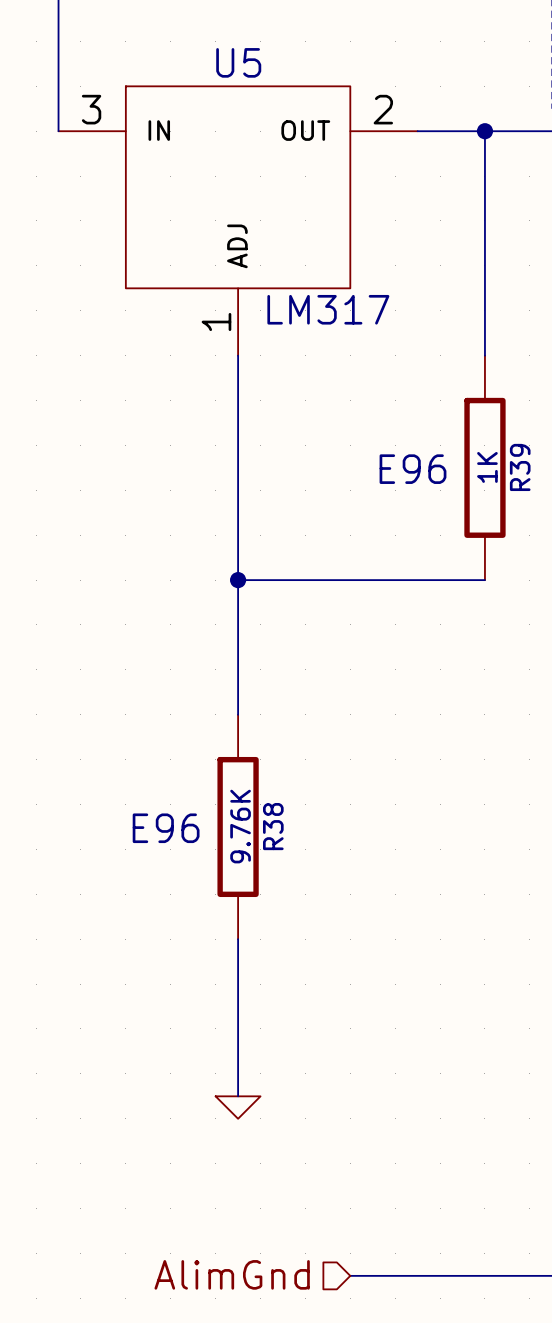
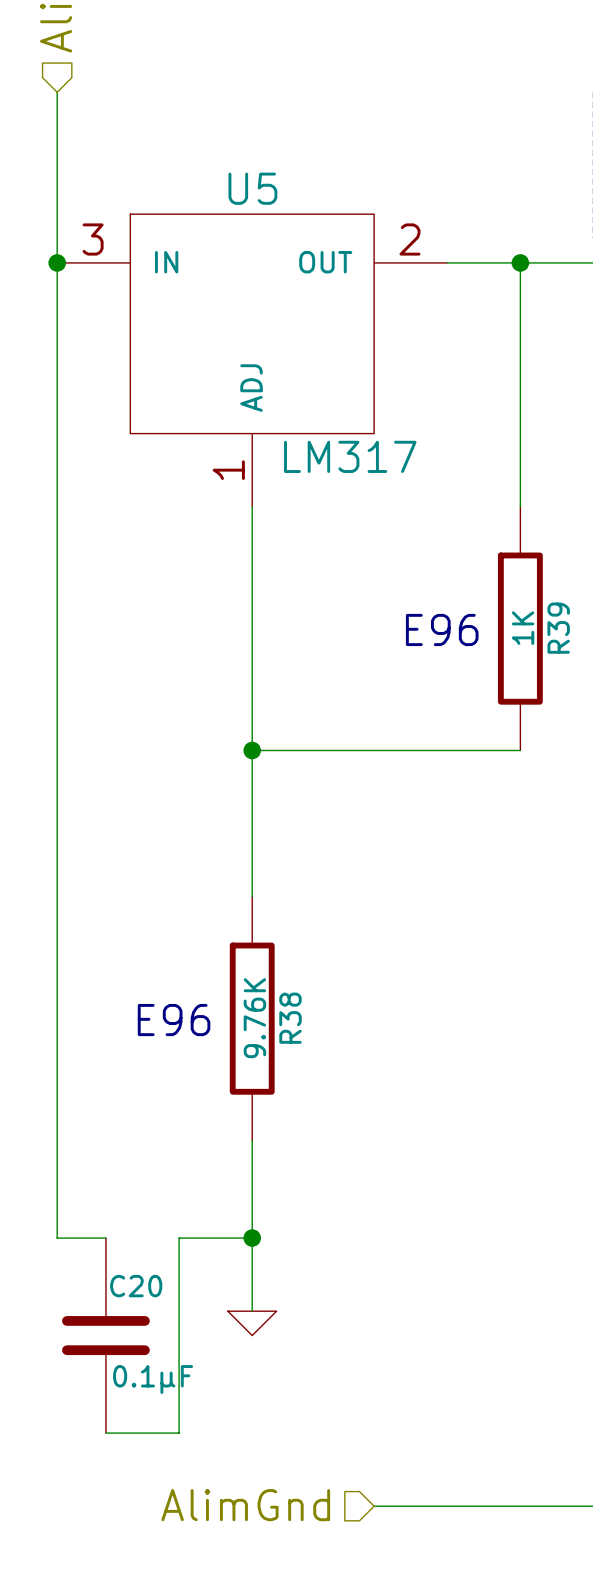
wire: none -> (57, 262) (57, 1238) (105, 1238)
junction: none -> (57, 262)
wire: none -> (252, 1238) (179, 1238) (179, 1433) (105, 1433)
junction: none -> (252, 1238)
C20: none -> 0.1µF (105, 1335)

